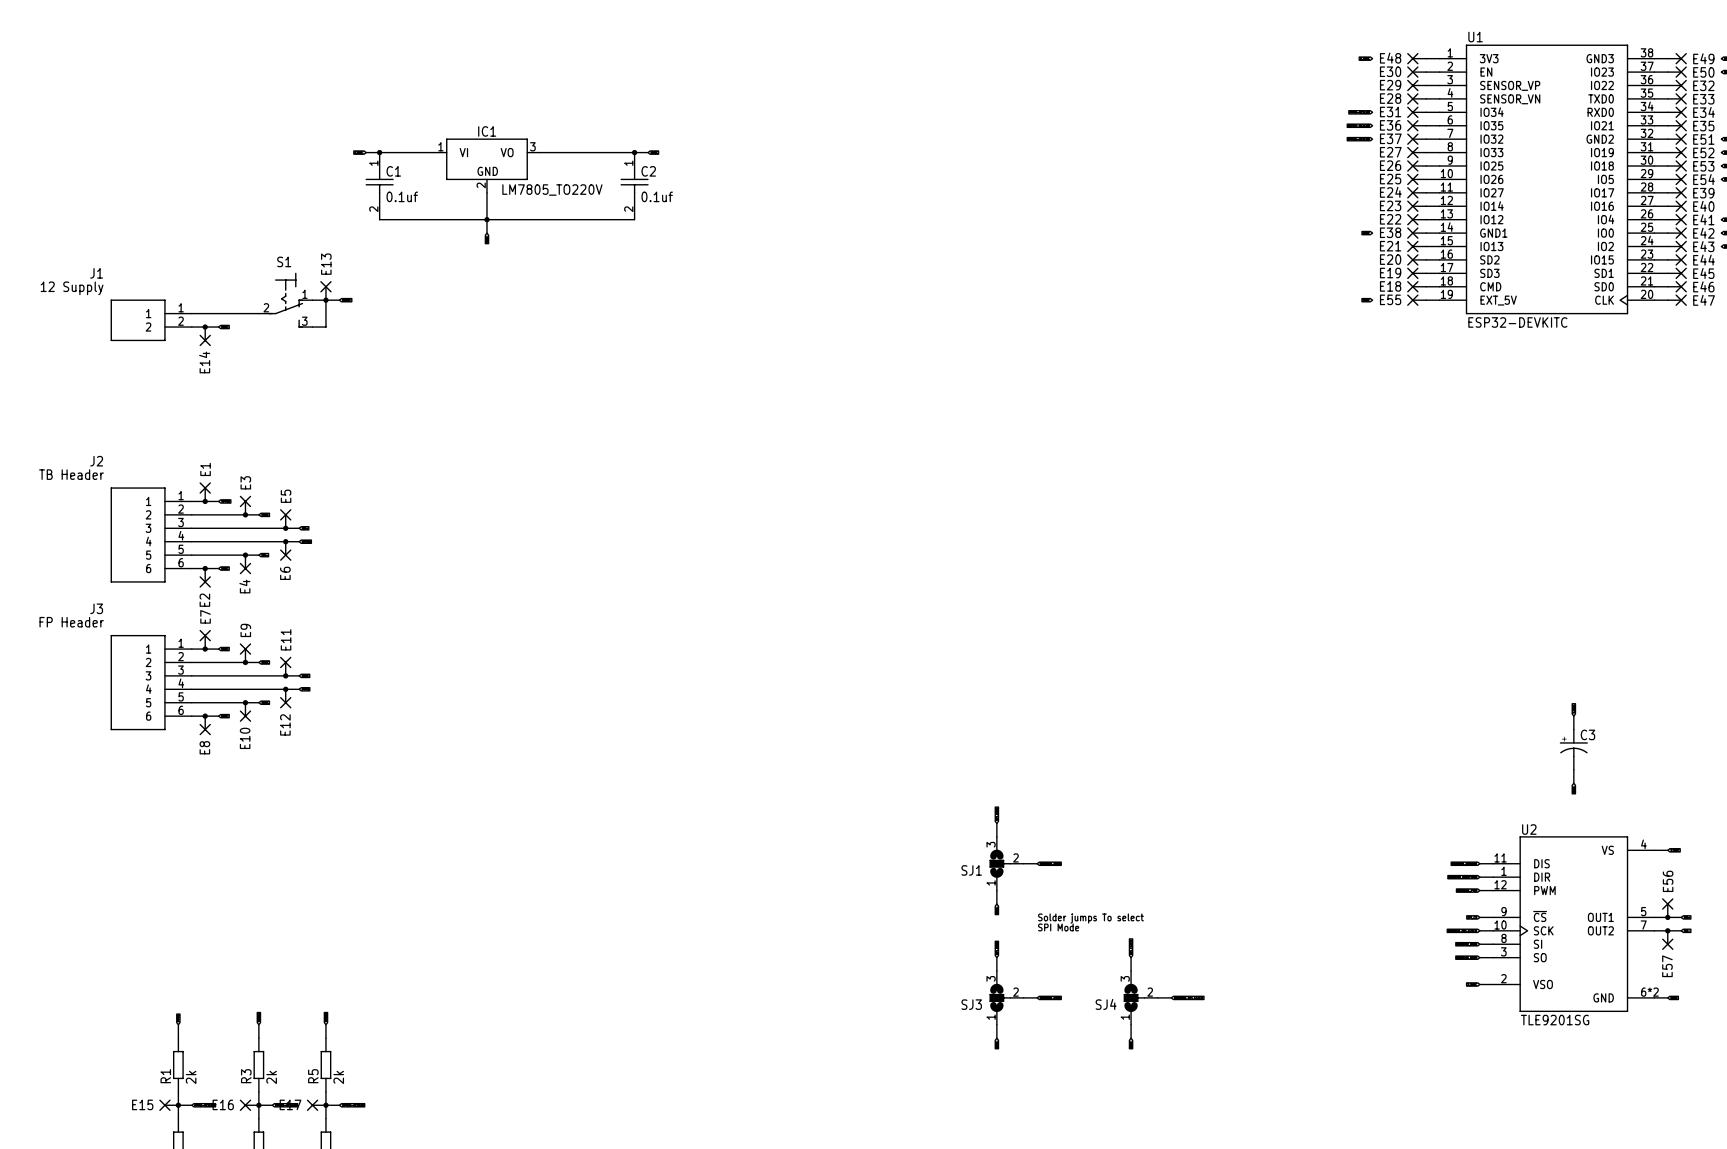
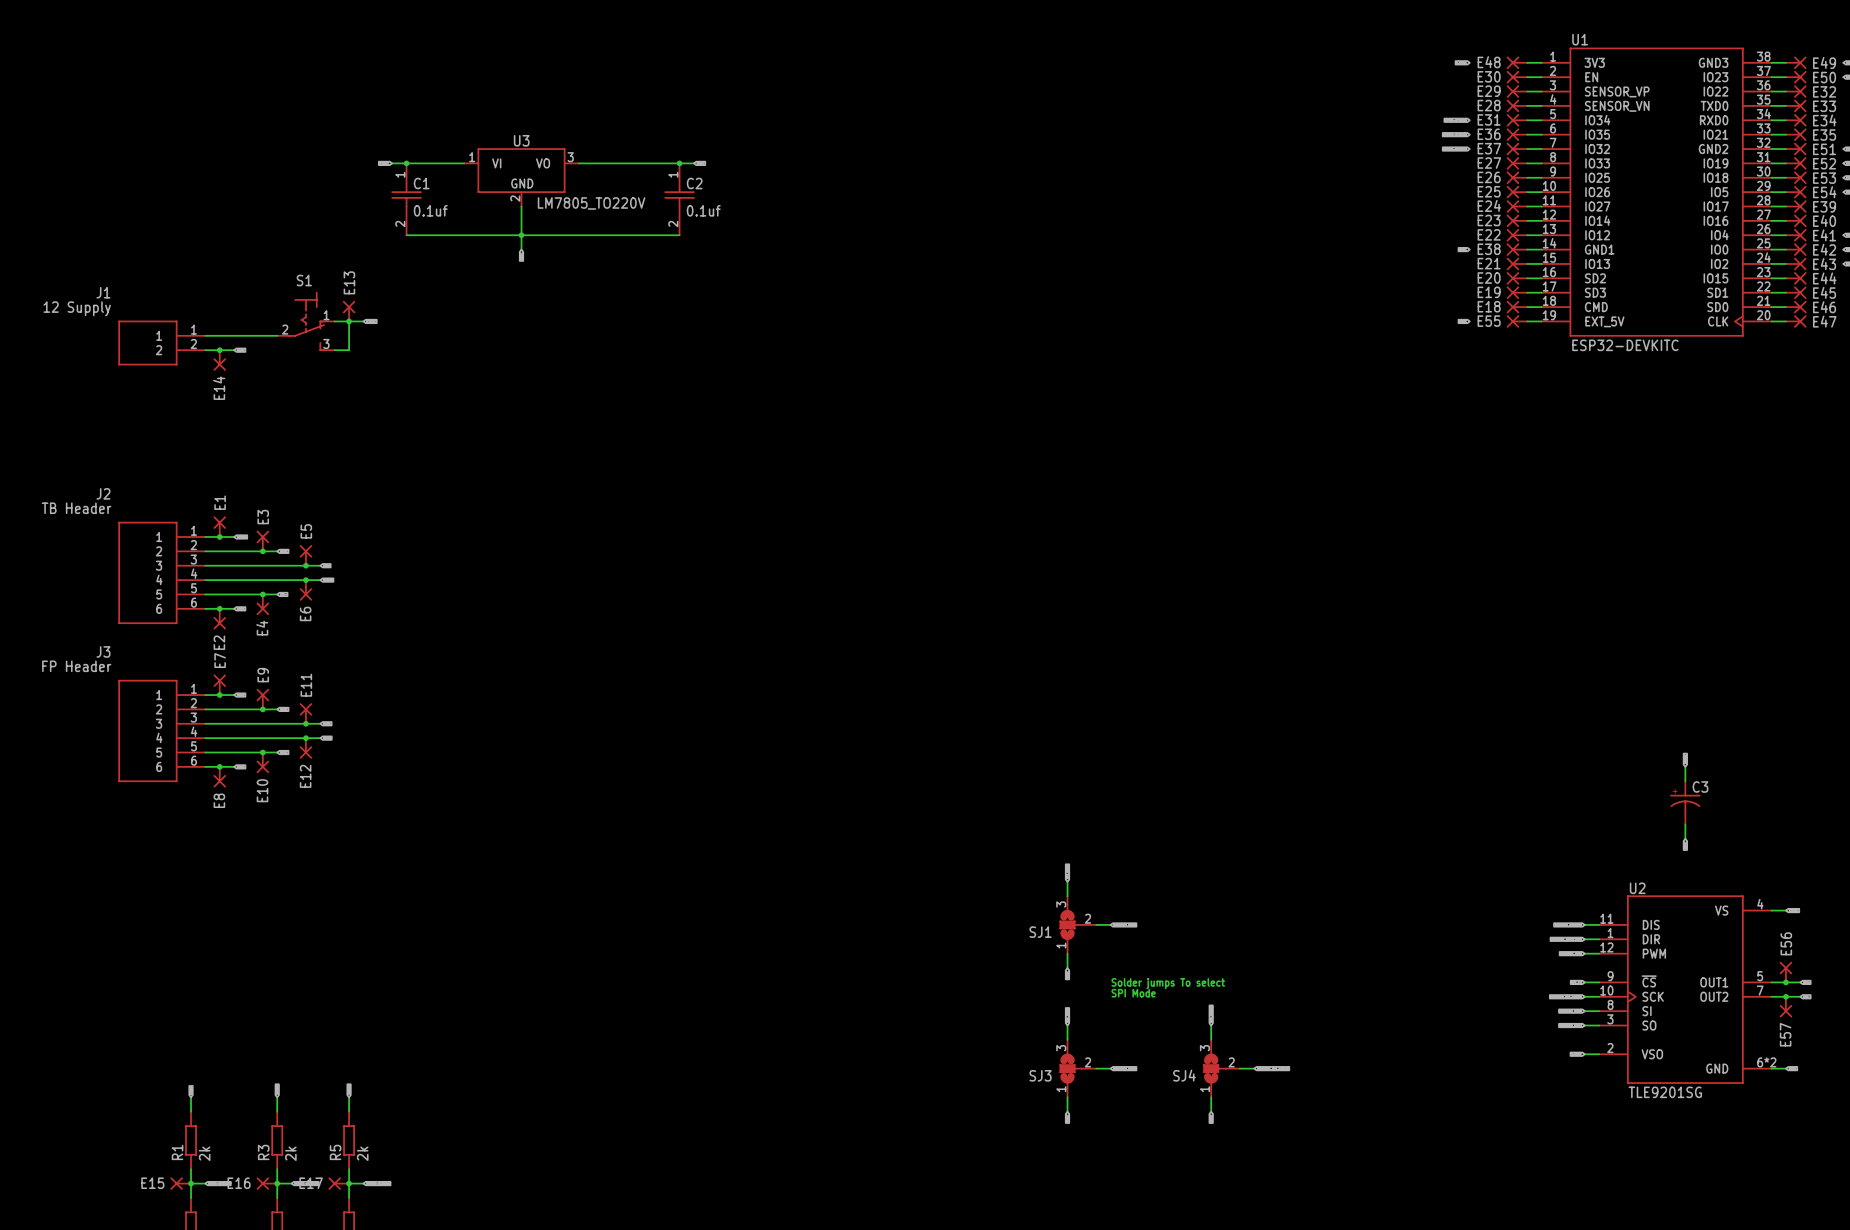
IC1 name: IC1 (487, 131) -> U3 (521, 140)

